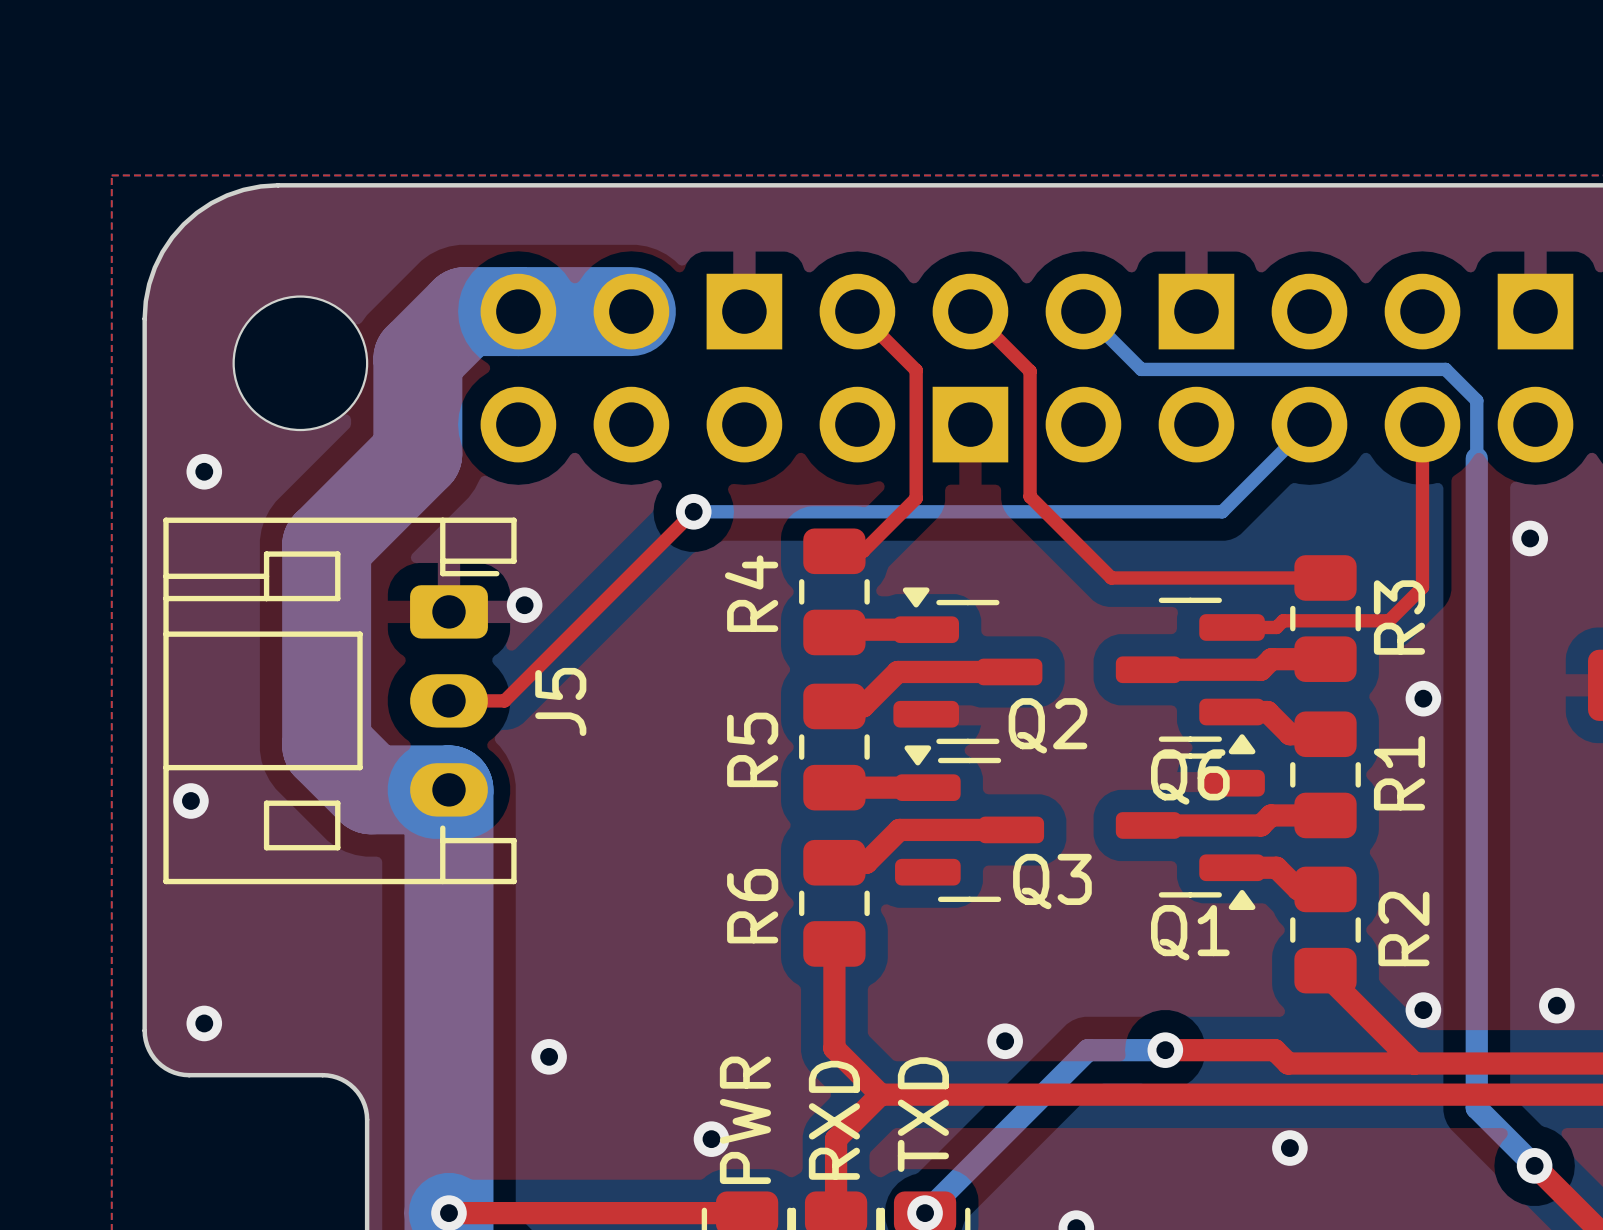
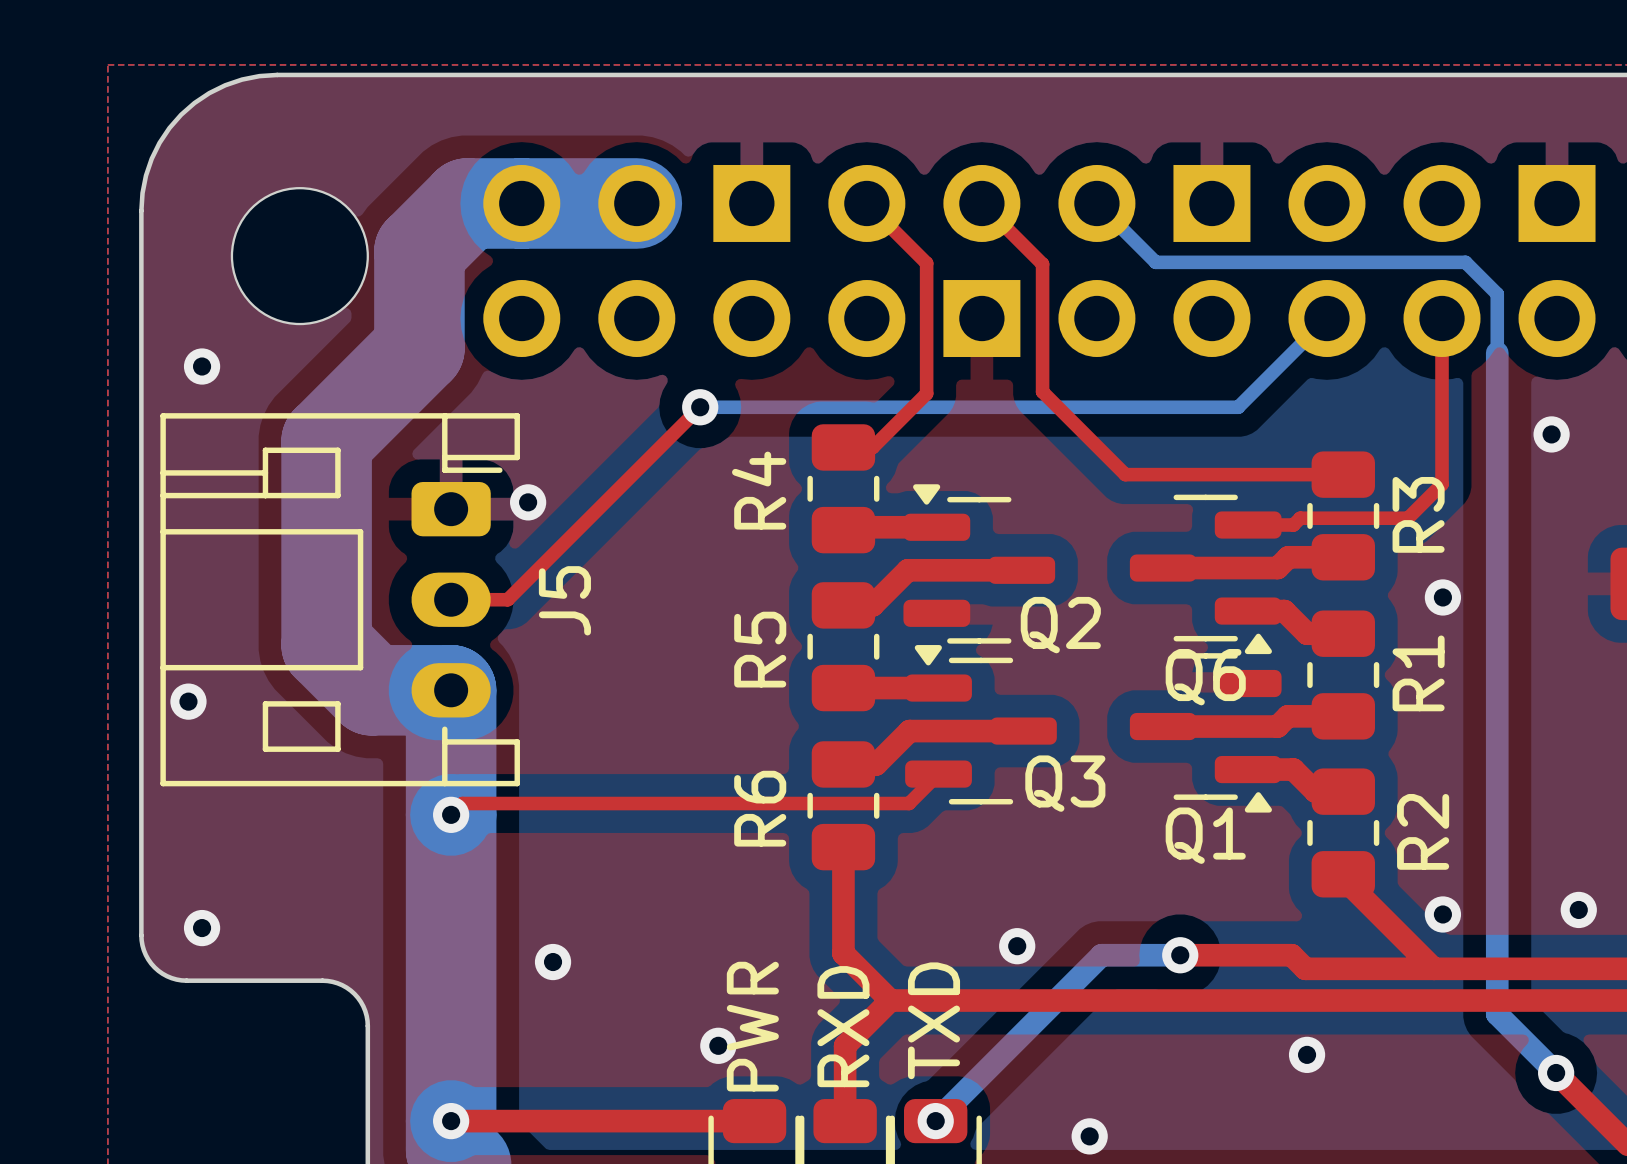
top track: none -> (938, 774) (909, 803) (462, 803) (451, 814)
via: none -> (451, 814)

